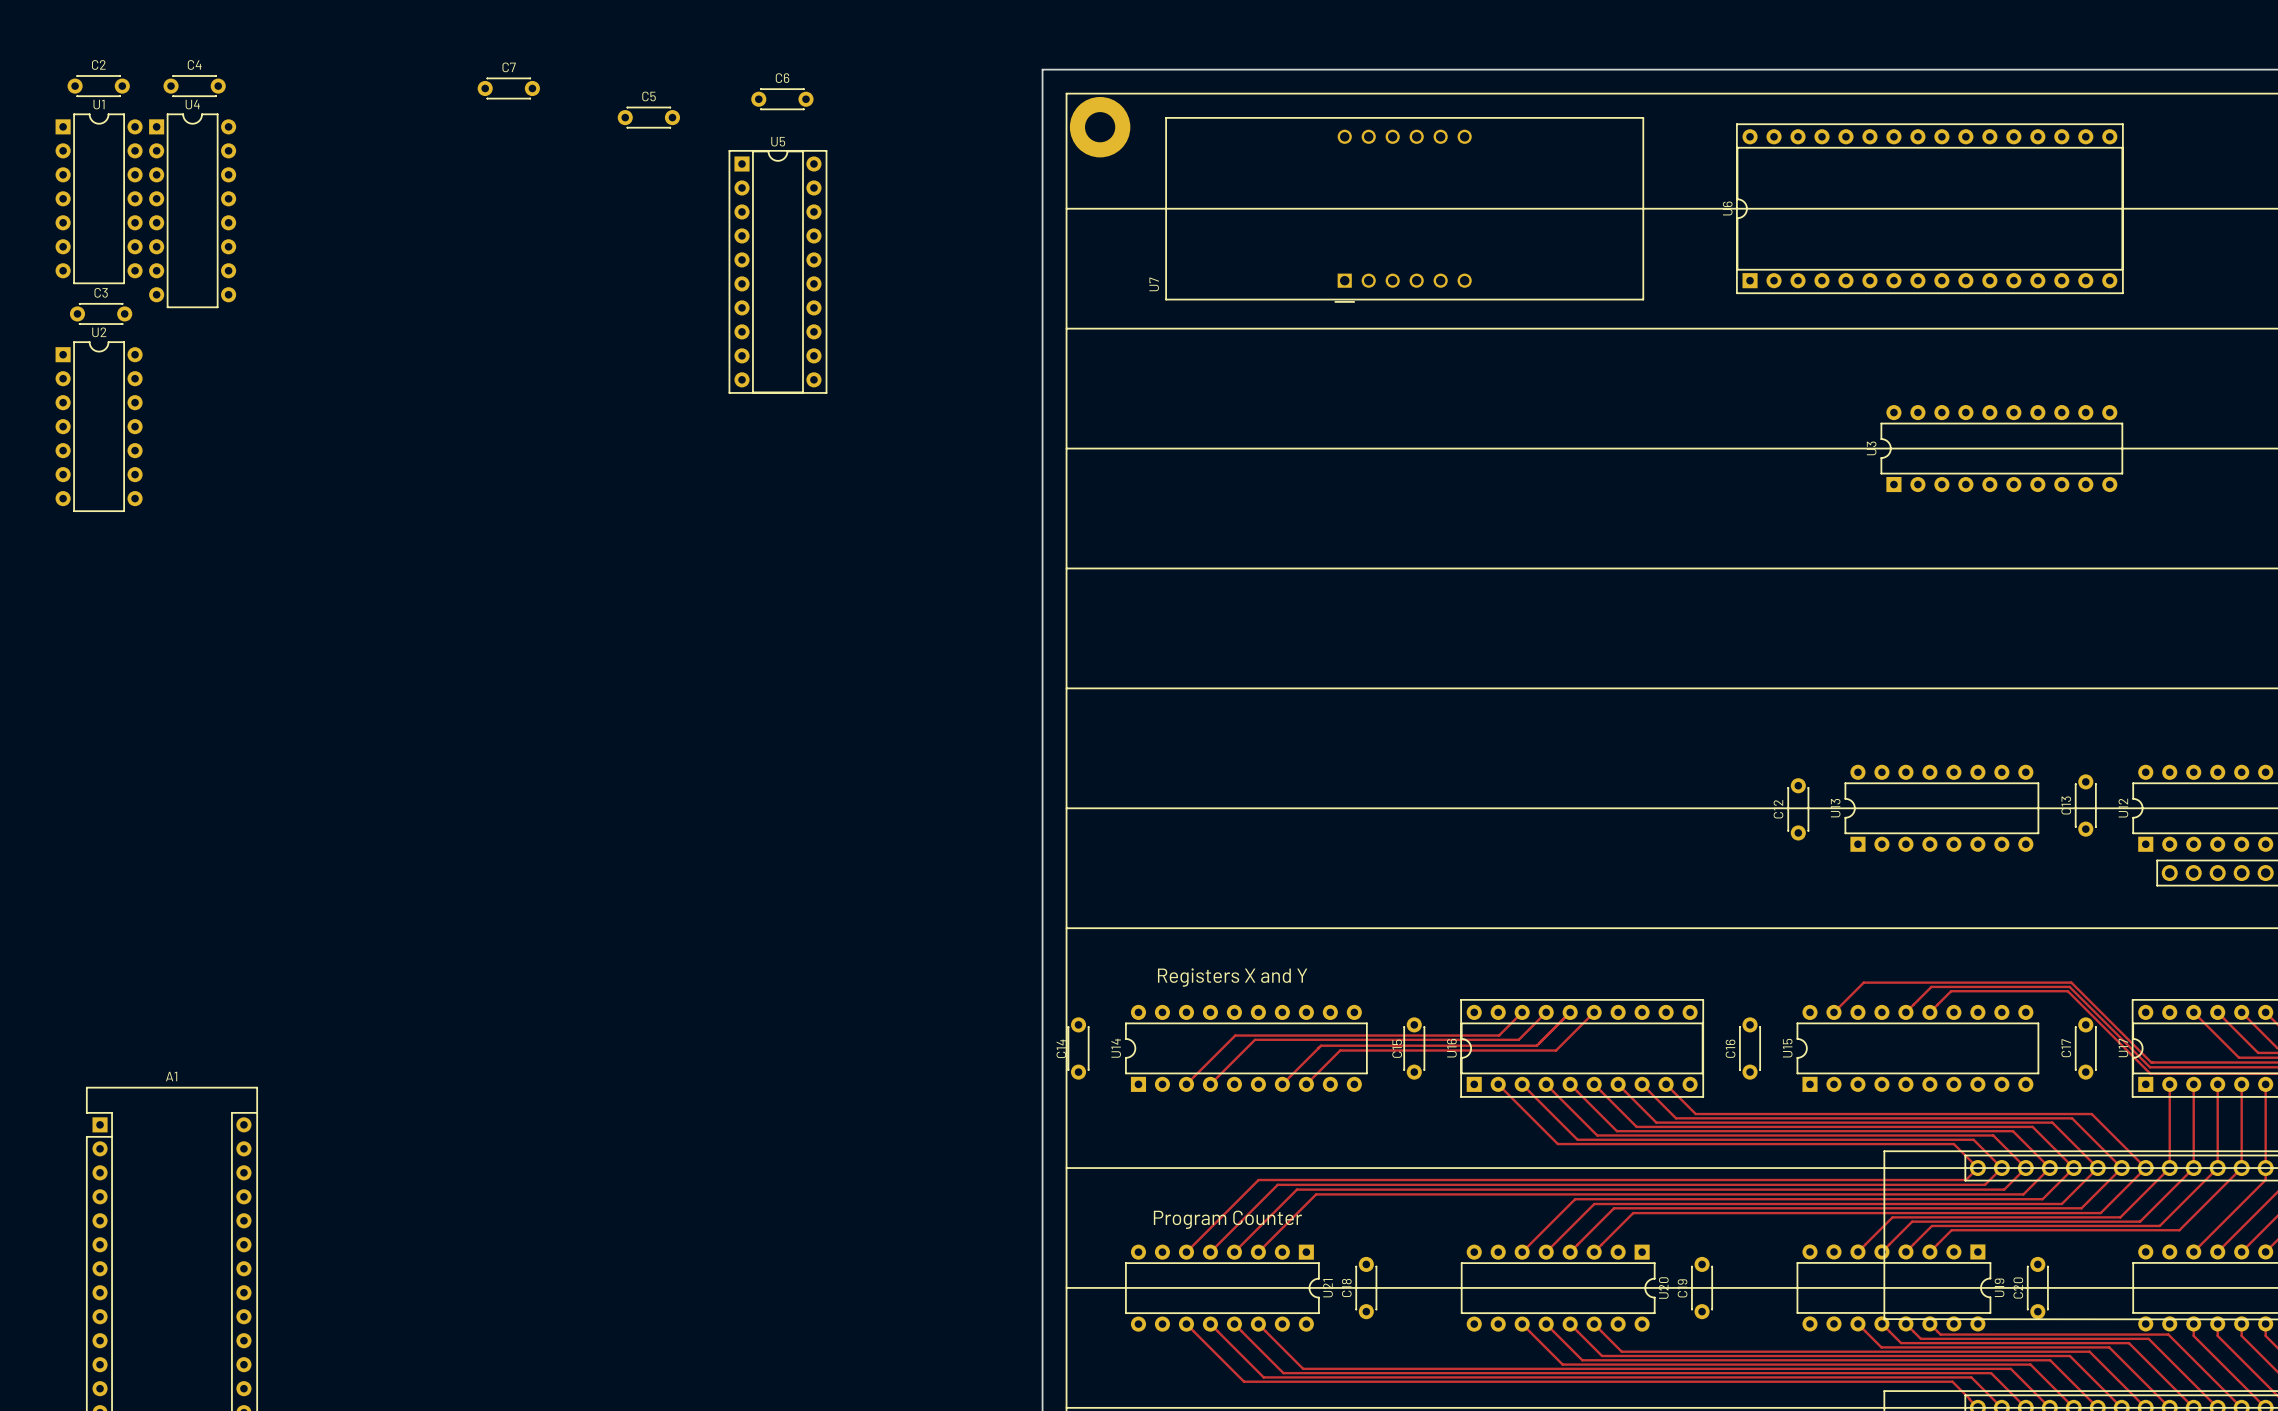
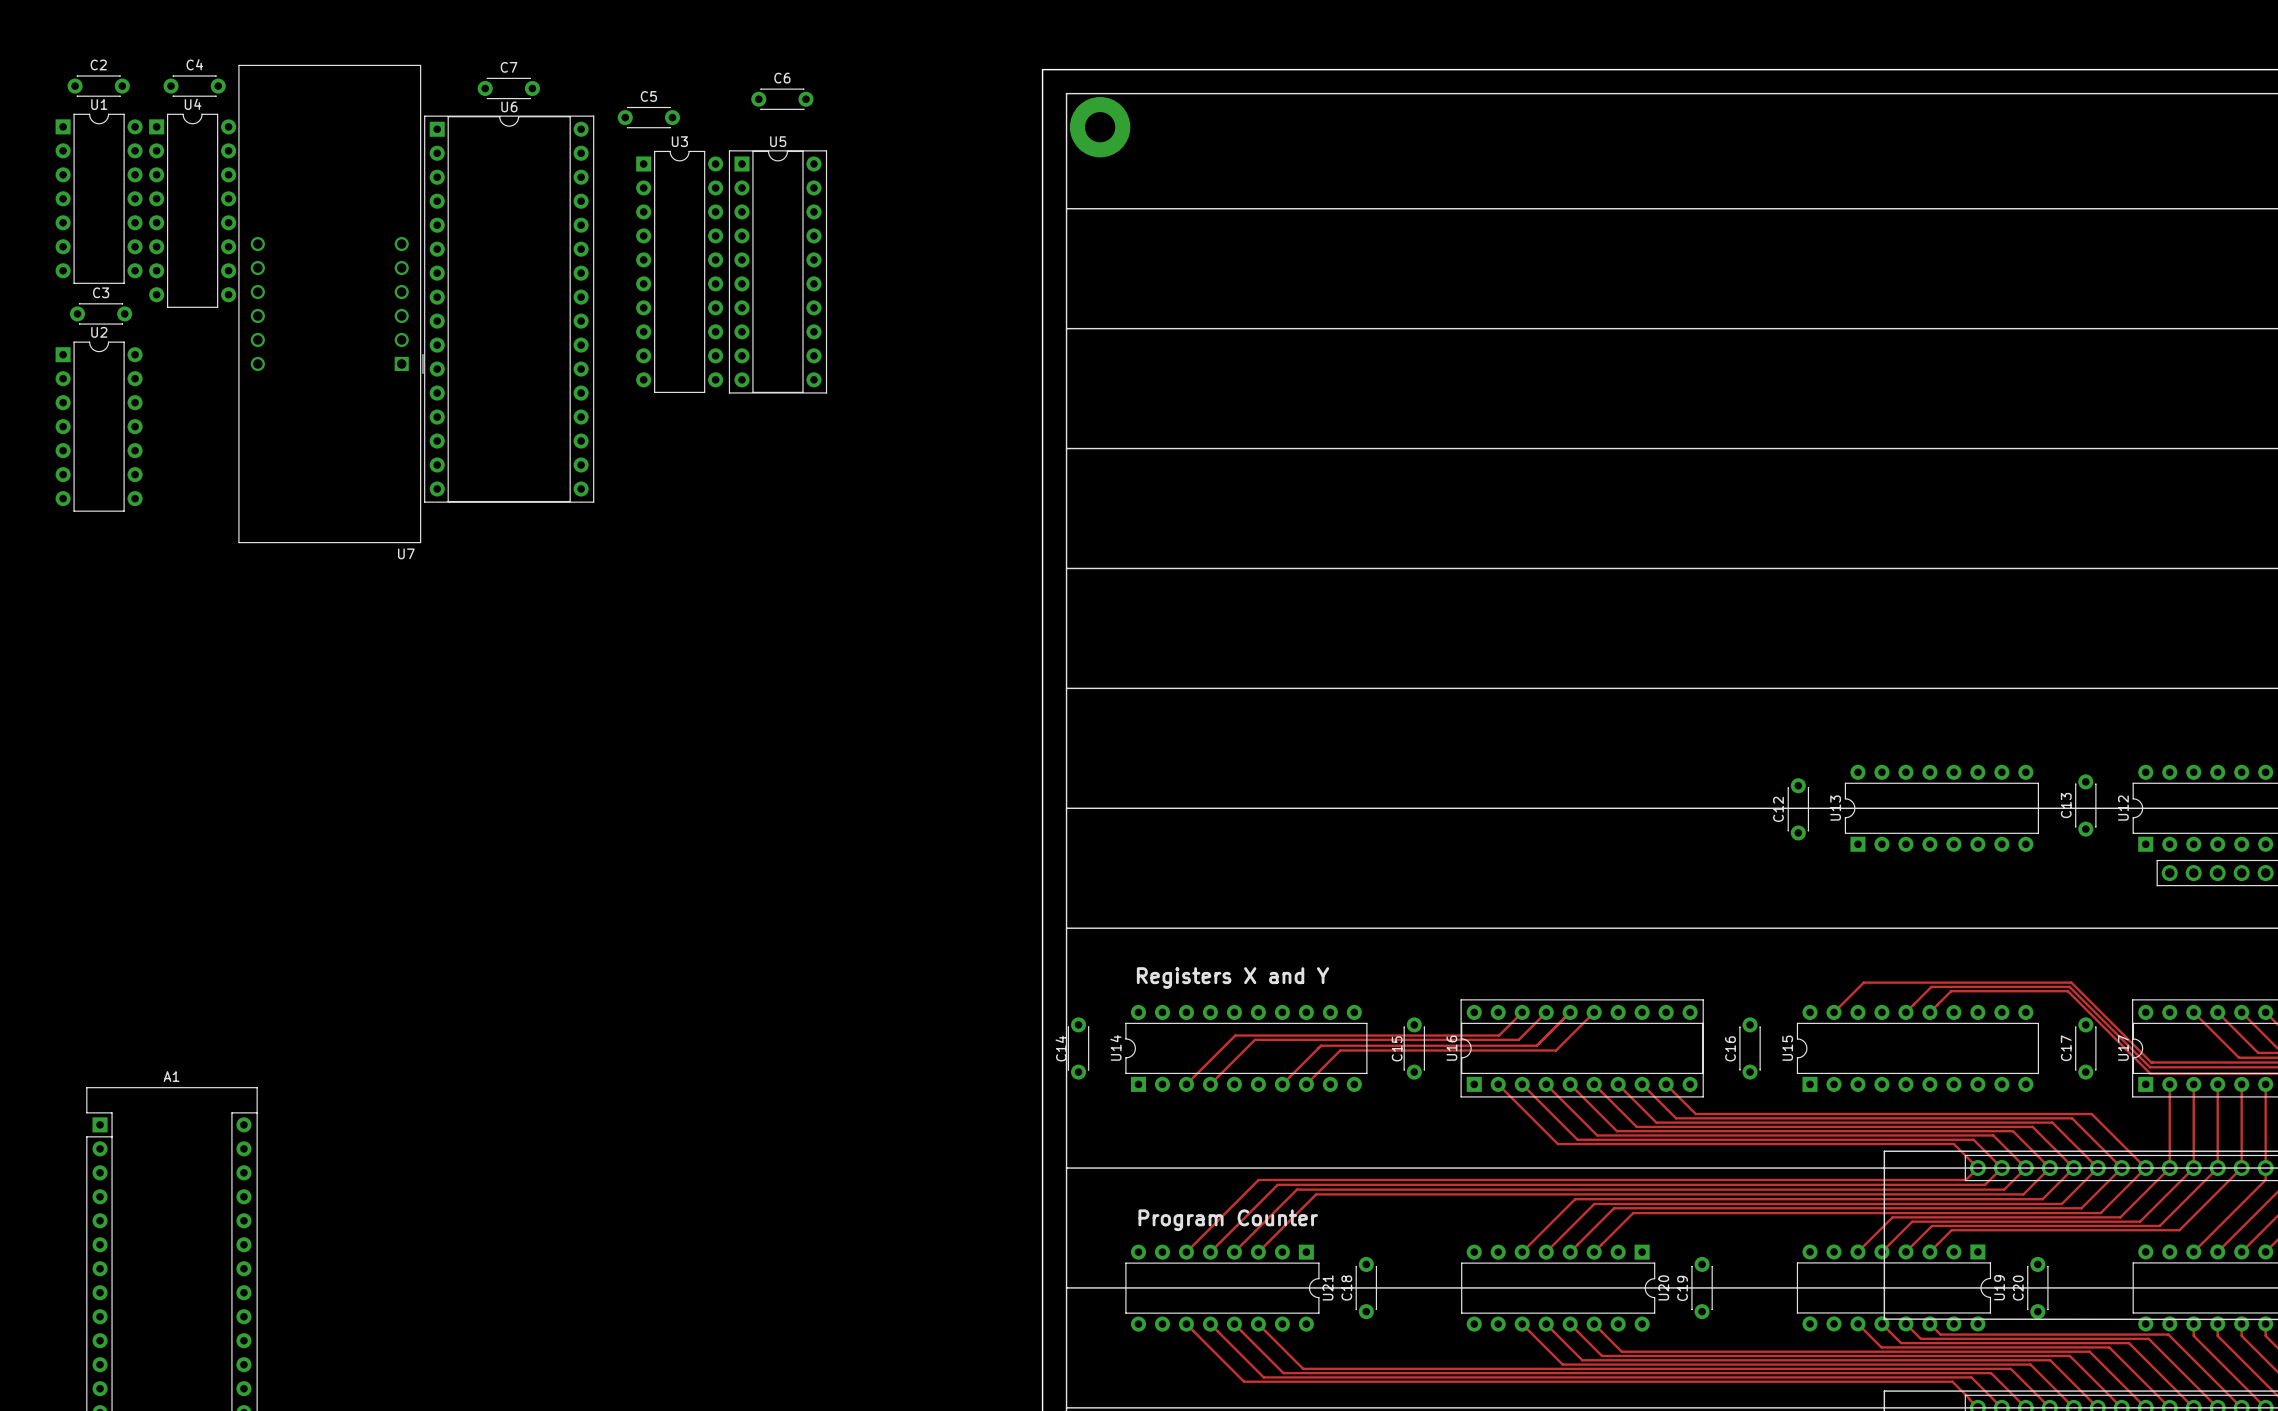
U6 rotation: 0° (1929, 208) -> 90° clockwise (509, 309)
U6 position: (1929, 208) -> (509, 309)
U7 rotation: 0° (1404, 209) -> 90° counterclockwise (330, 304)
U7 position: (1404, 209) -> (330, 304)
U3 rotation: 0° (2001, 448) -> 90° clockwise (679, 271)
U3 position: (2001, 448) -> (679, 271)

